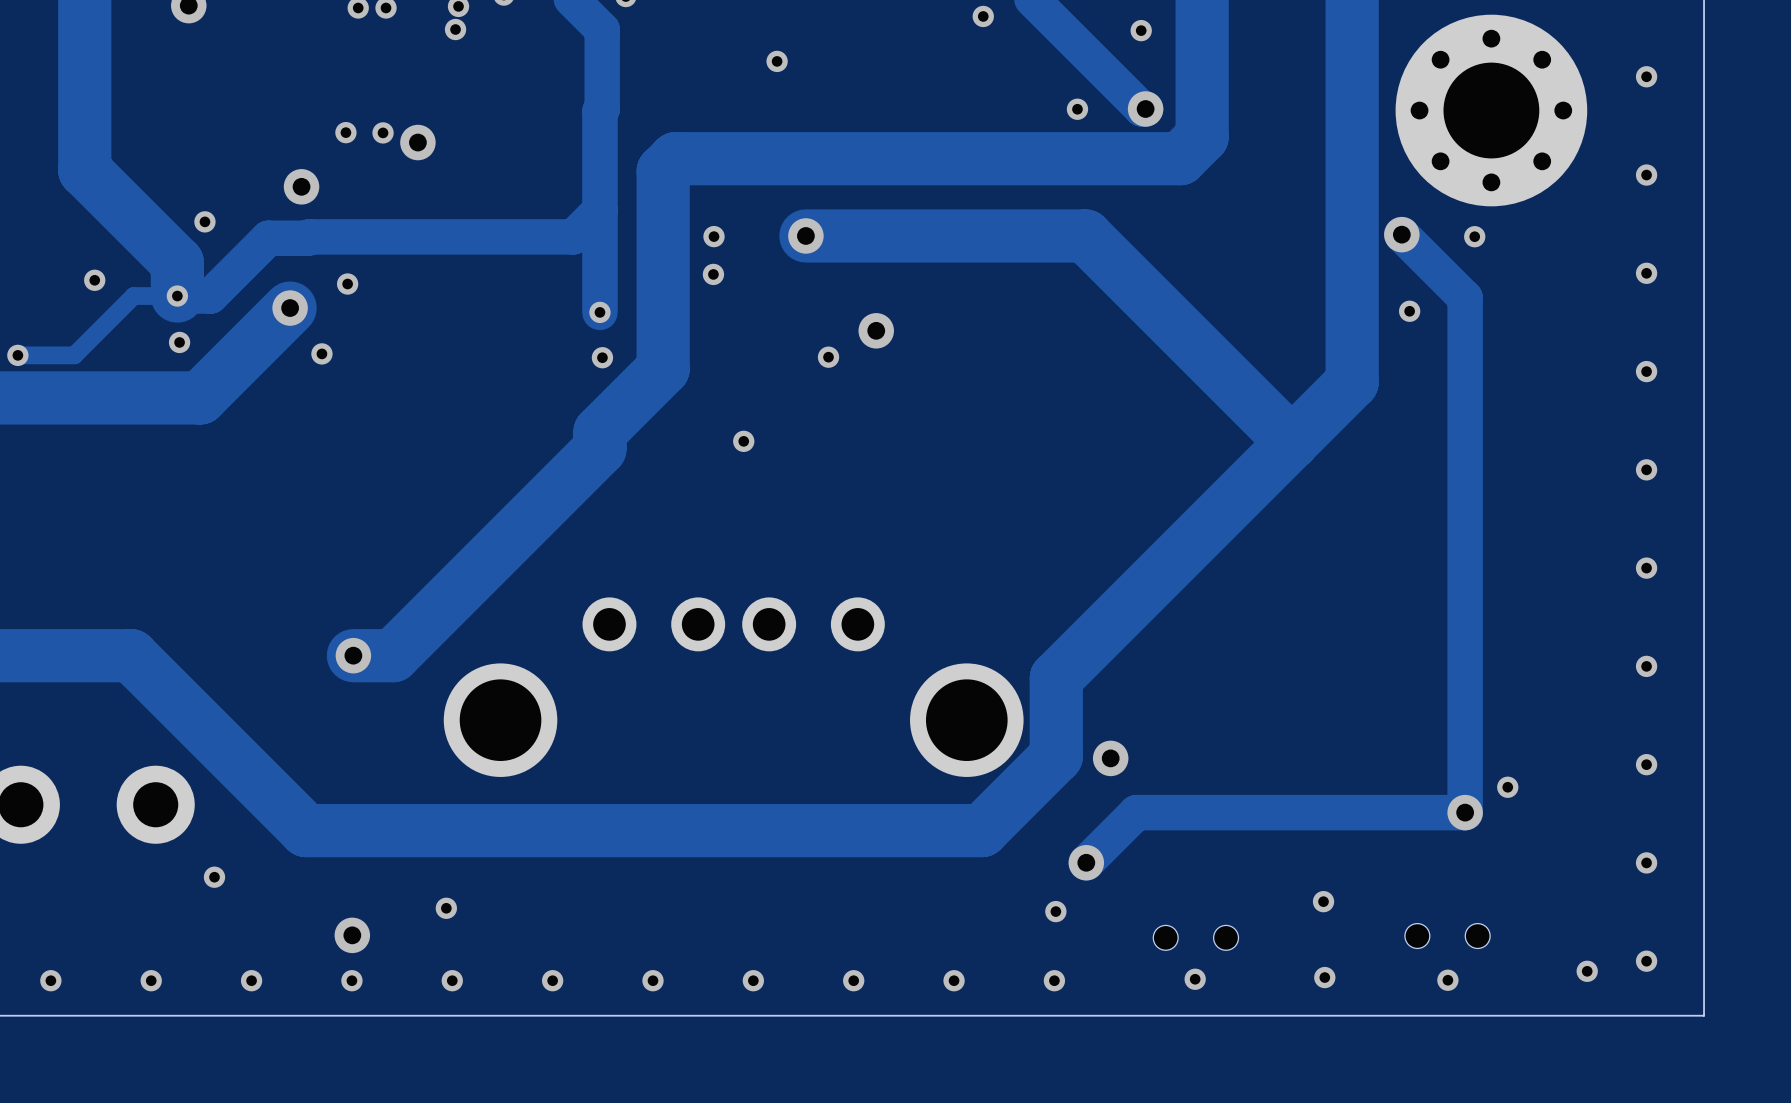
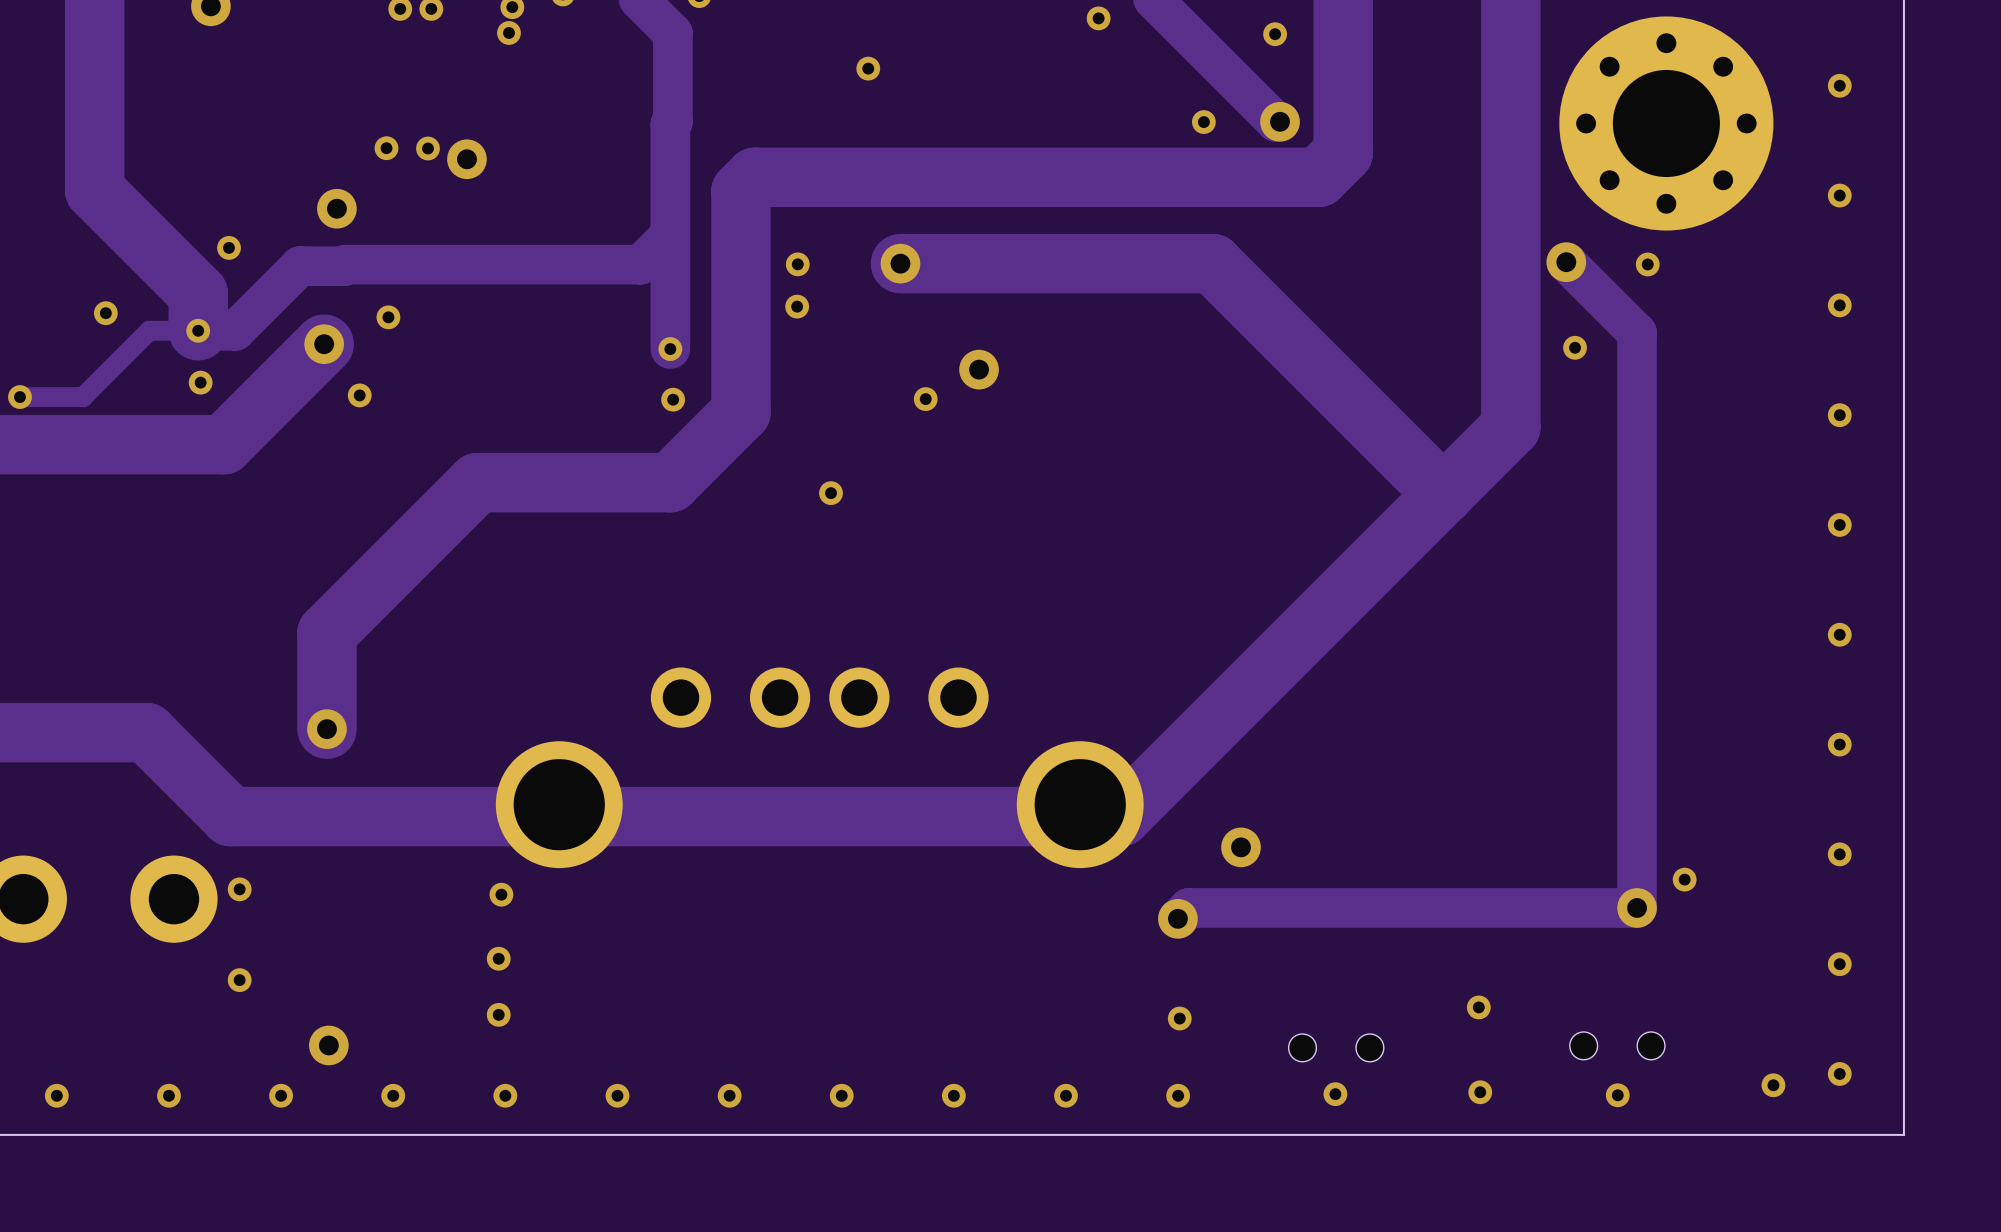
track: (599, 431) (599, 448) (393, 655) (353, 655) -> (670, 482) (477, 482) (326, 633) (326, 729)
via position: (353, 655) -> (326, 729)
track: (1056, 678) (1056, 756) (981, 830) (306, 830) (206, 730) -> (1180, 757) (1121, 816) (230, 816)
via: none -> (239, 889)
via: none -> (501, 894)
track: (1136, 812) (1086, 862) -> (1269, 907) (1188, 907) (1177, 918)
via: none -> (498, 958)
via position: (1086, 862) -> (1177, 918)
via position: (352, 935) -> (328, 1045)

